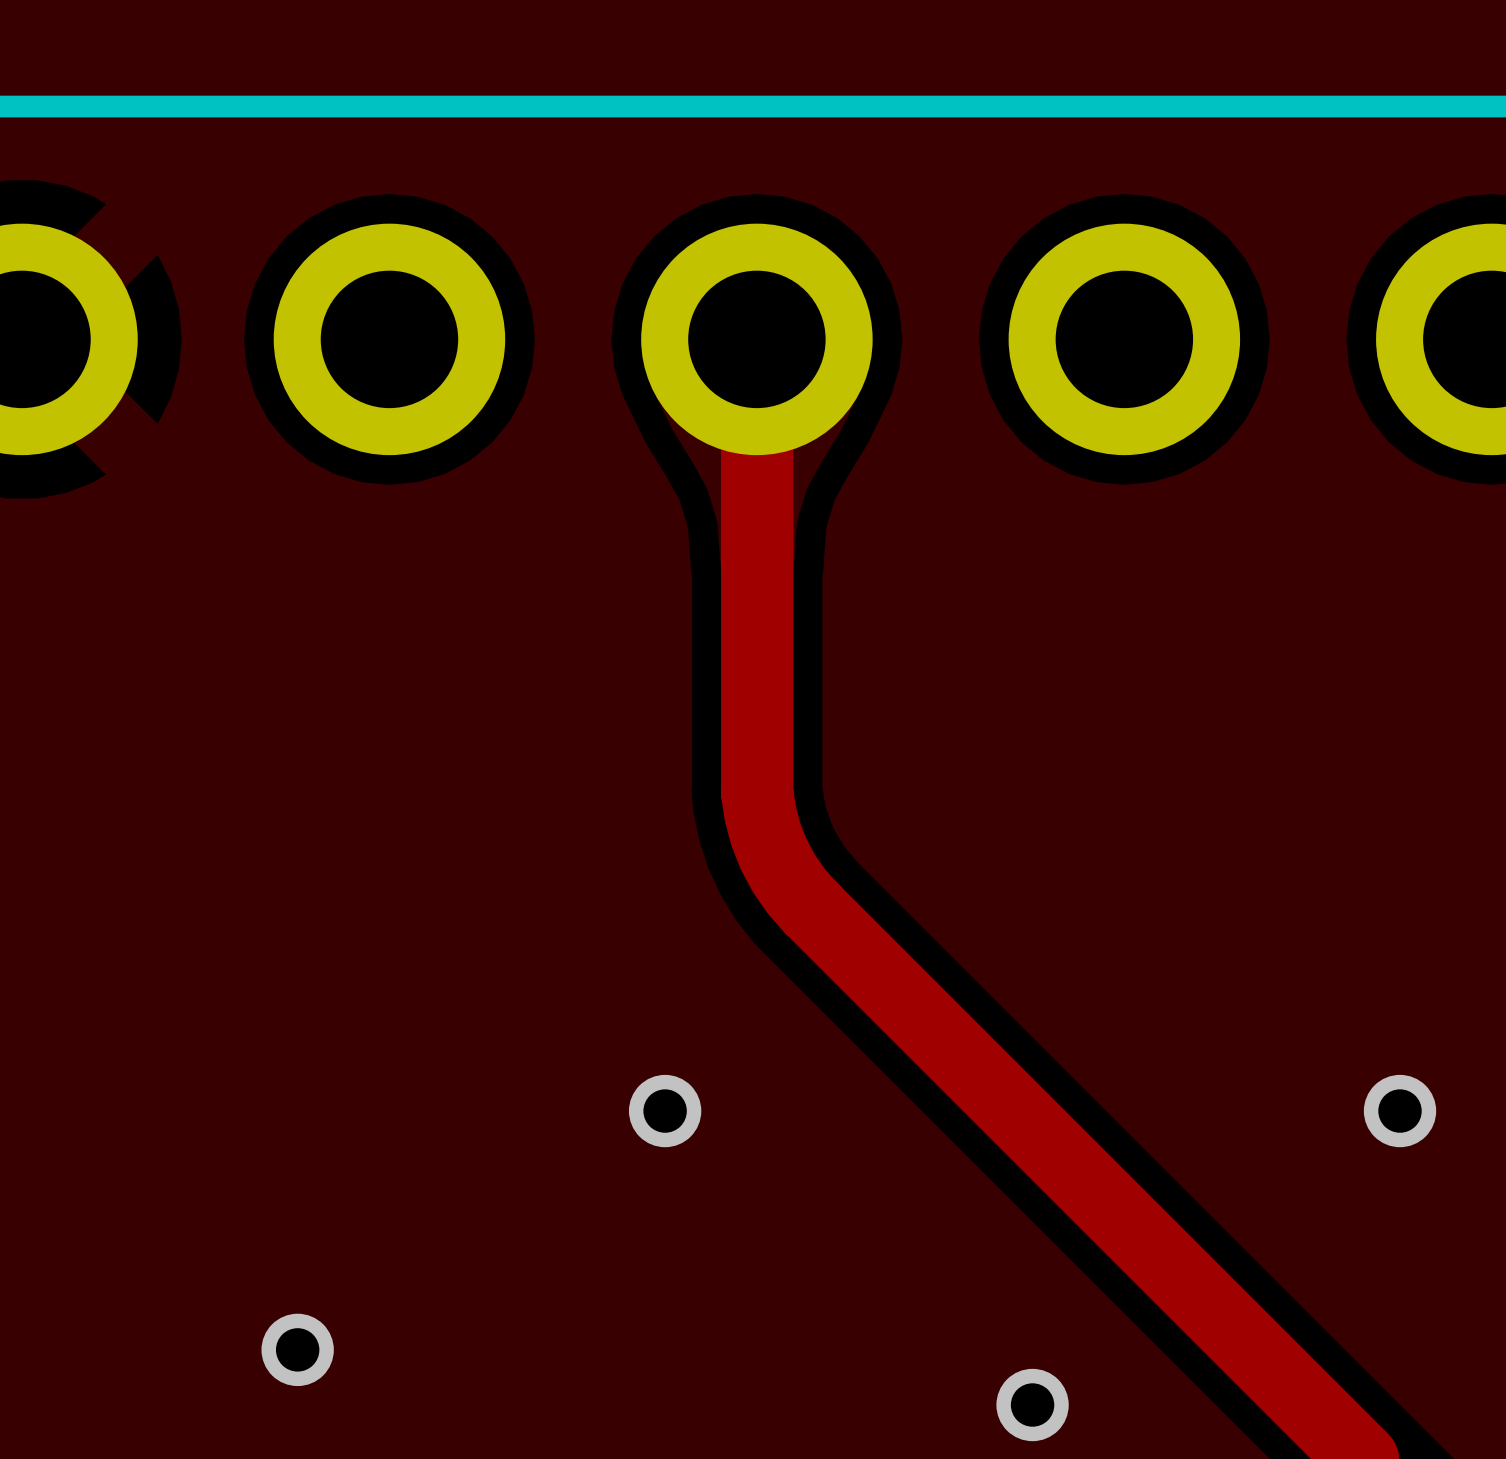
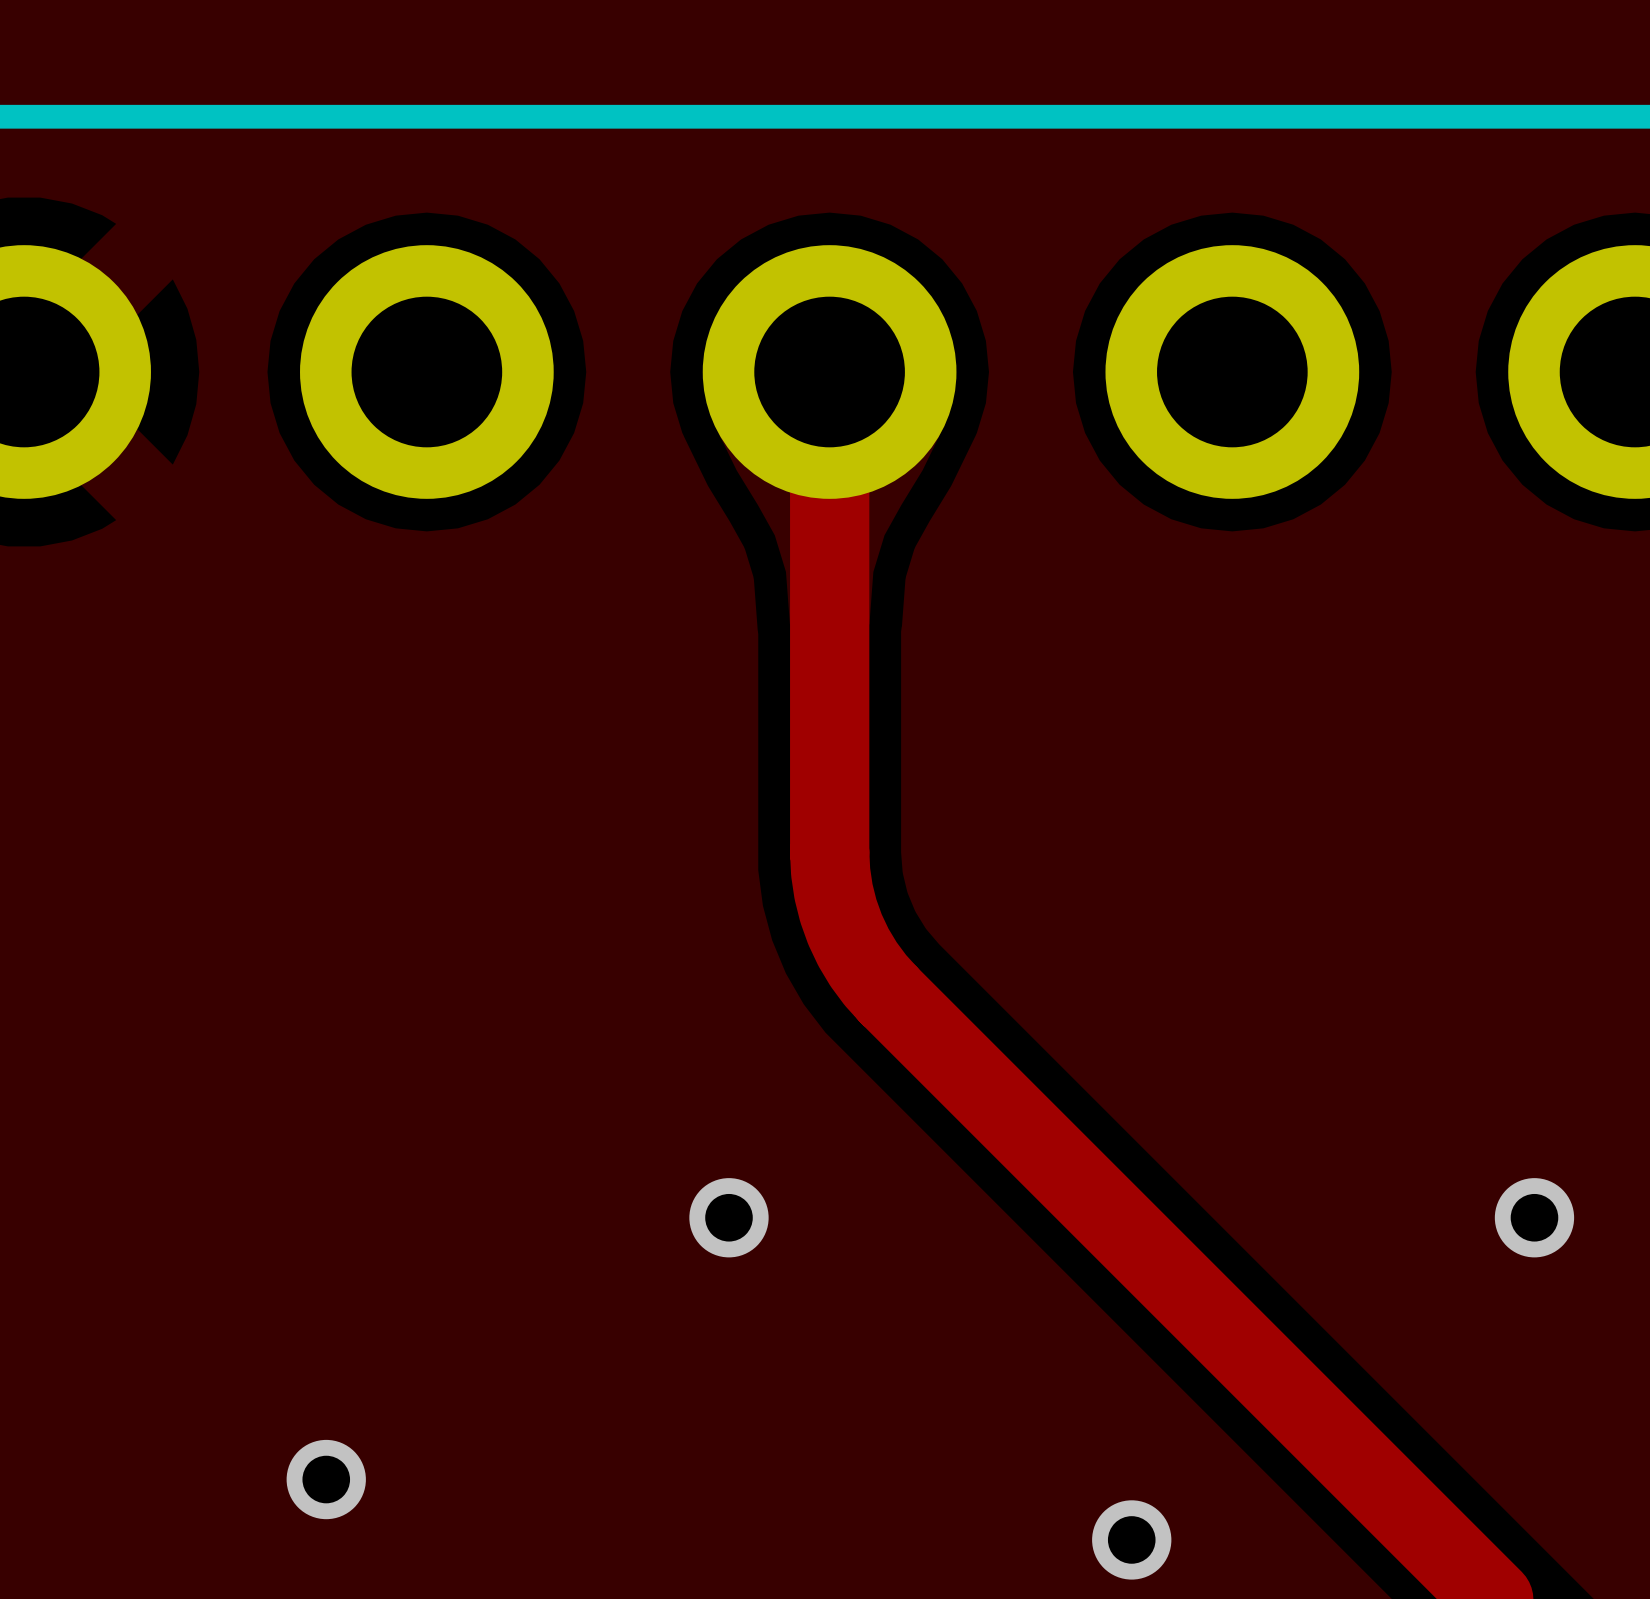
track: (757, 339) (757, 792) (765, 834) (773, 854) (784, 873) (810, 907) -> (829, 392) (830, 872) (838, 910) (853, 947) (875, 980) (888, 994)

